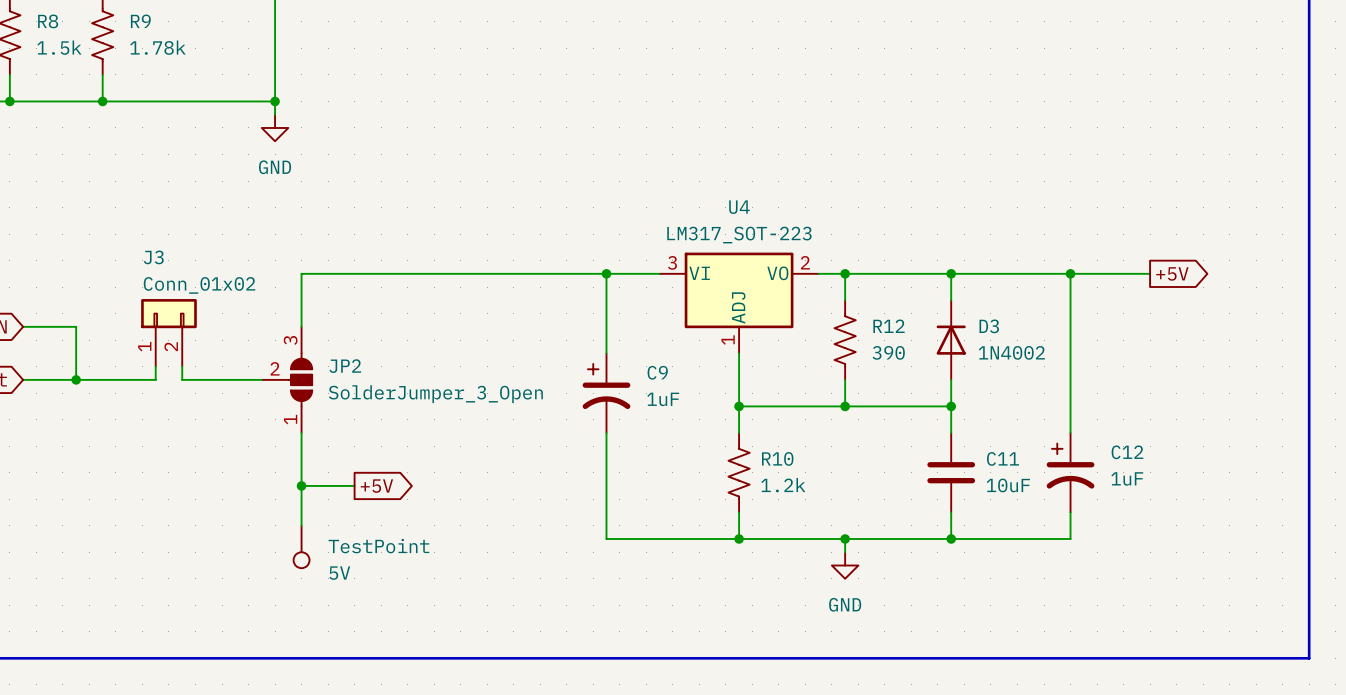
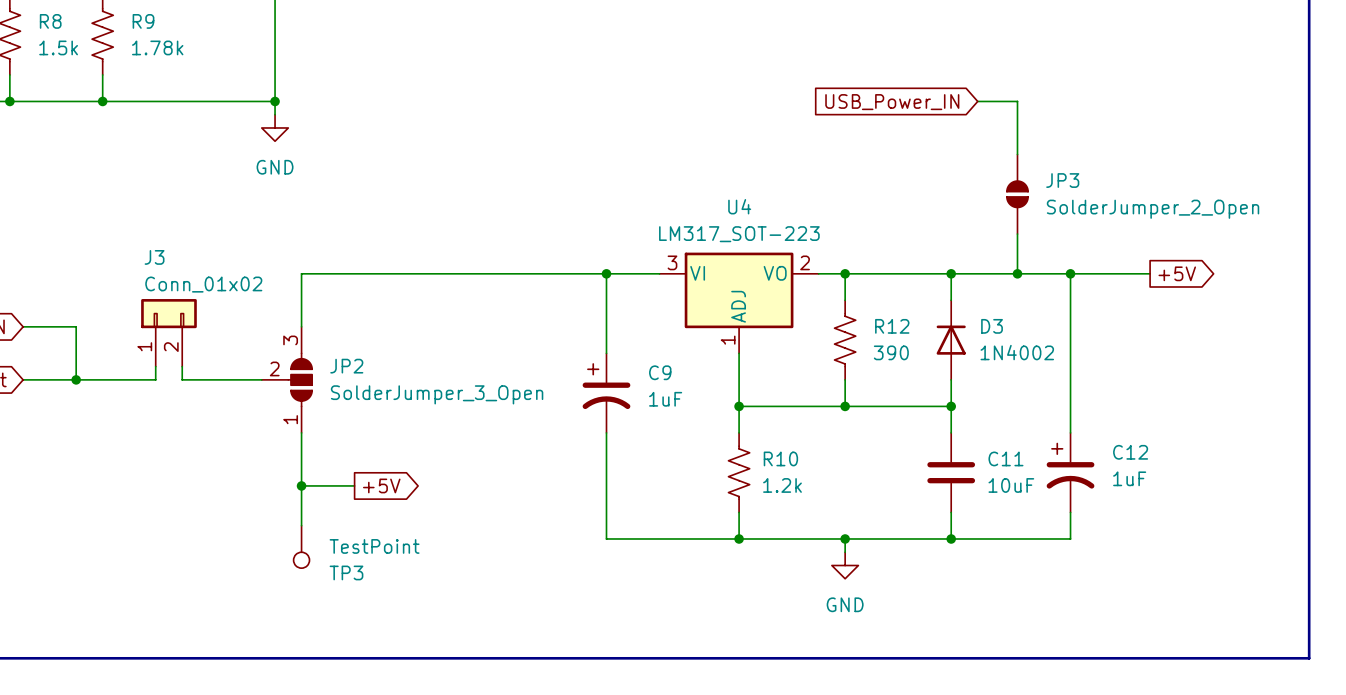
wire: none -> (977, 101) (1017, 101) (1017, 154)
global label: none -> USB_Power_IN (892, 102)
JP3: none -> SolderJumper_2_Open (1017, 194)
wire: none -> (1017, 234) (1017, 273)
junction: none -> (1017, 273)
5V name: 5V (339, 573) -> TP3 (346, 572)

